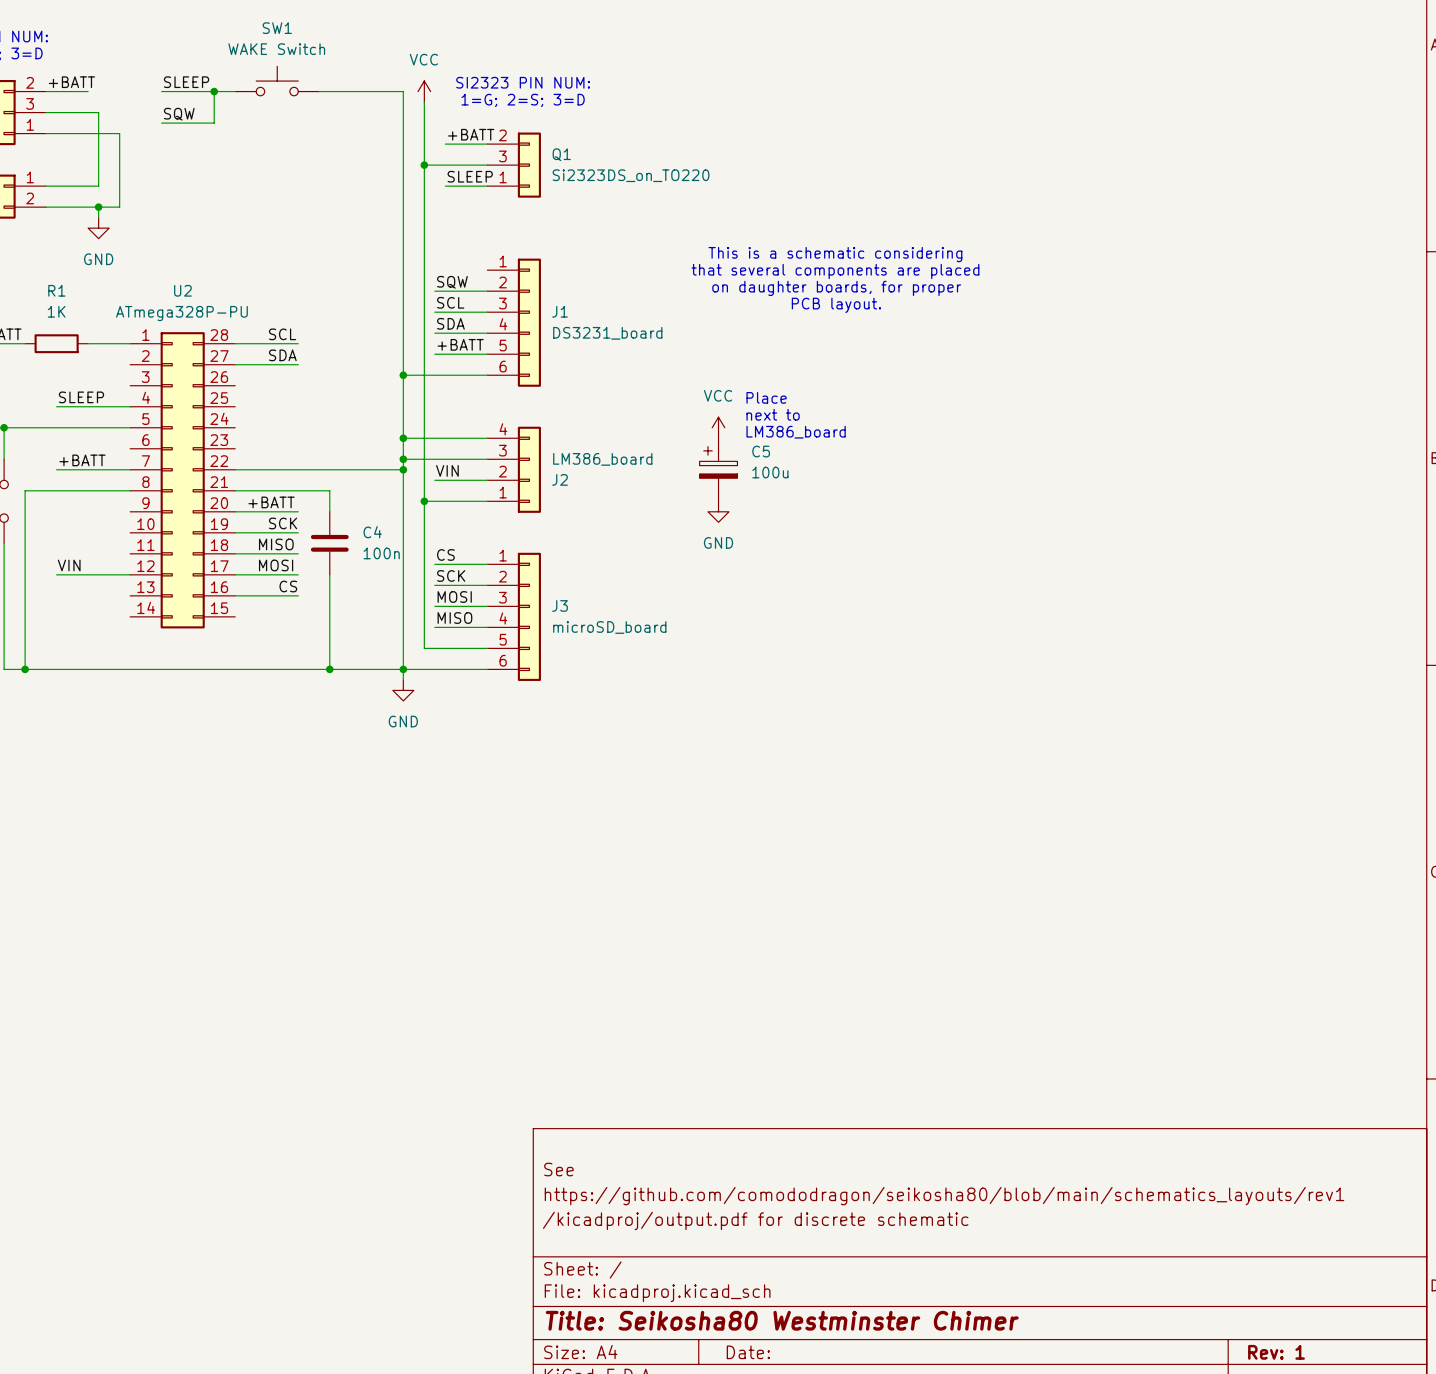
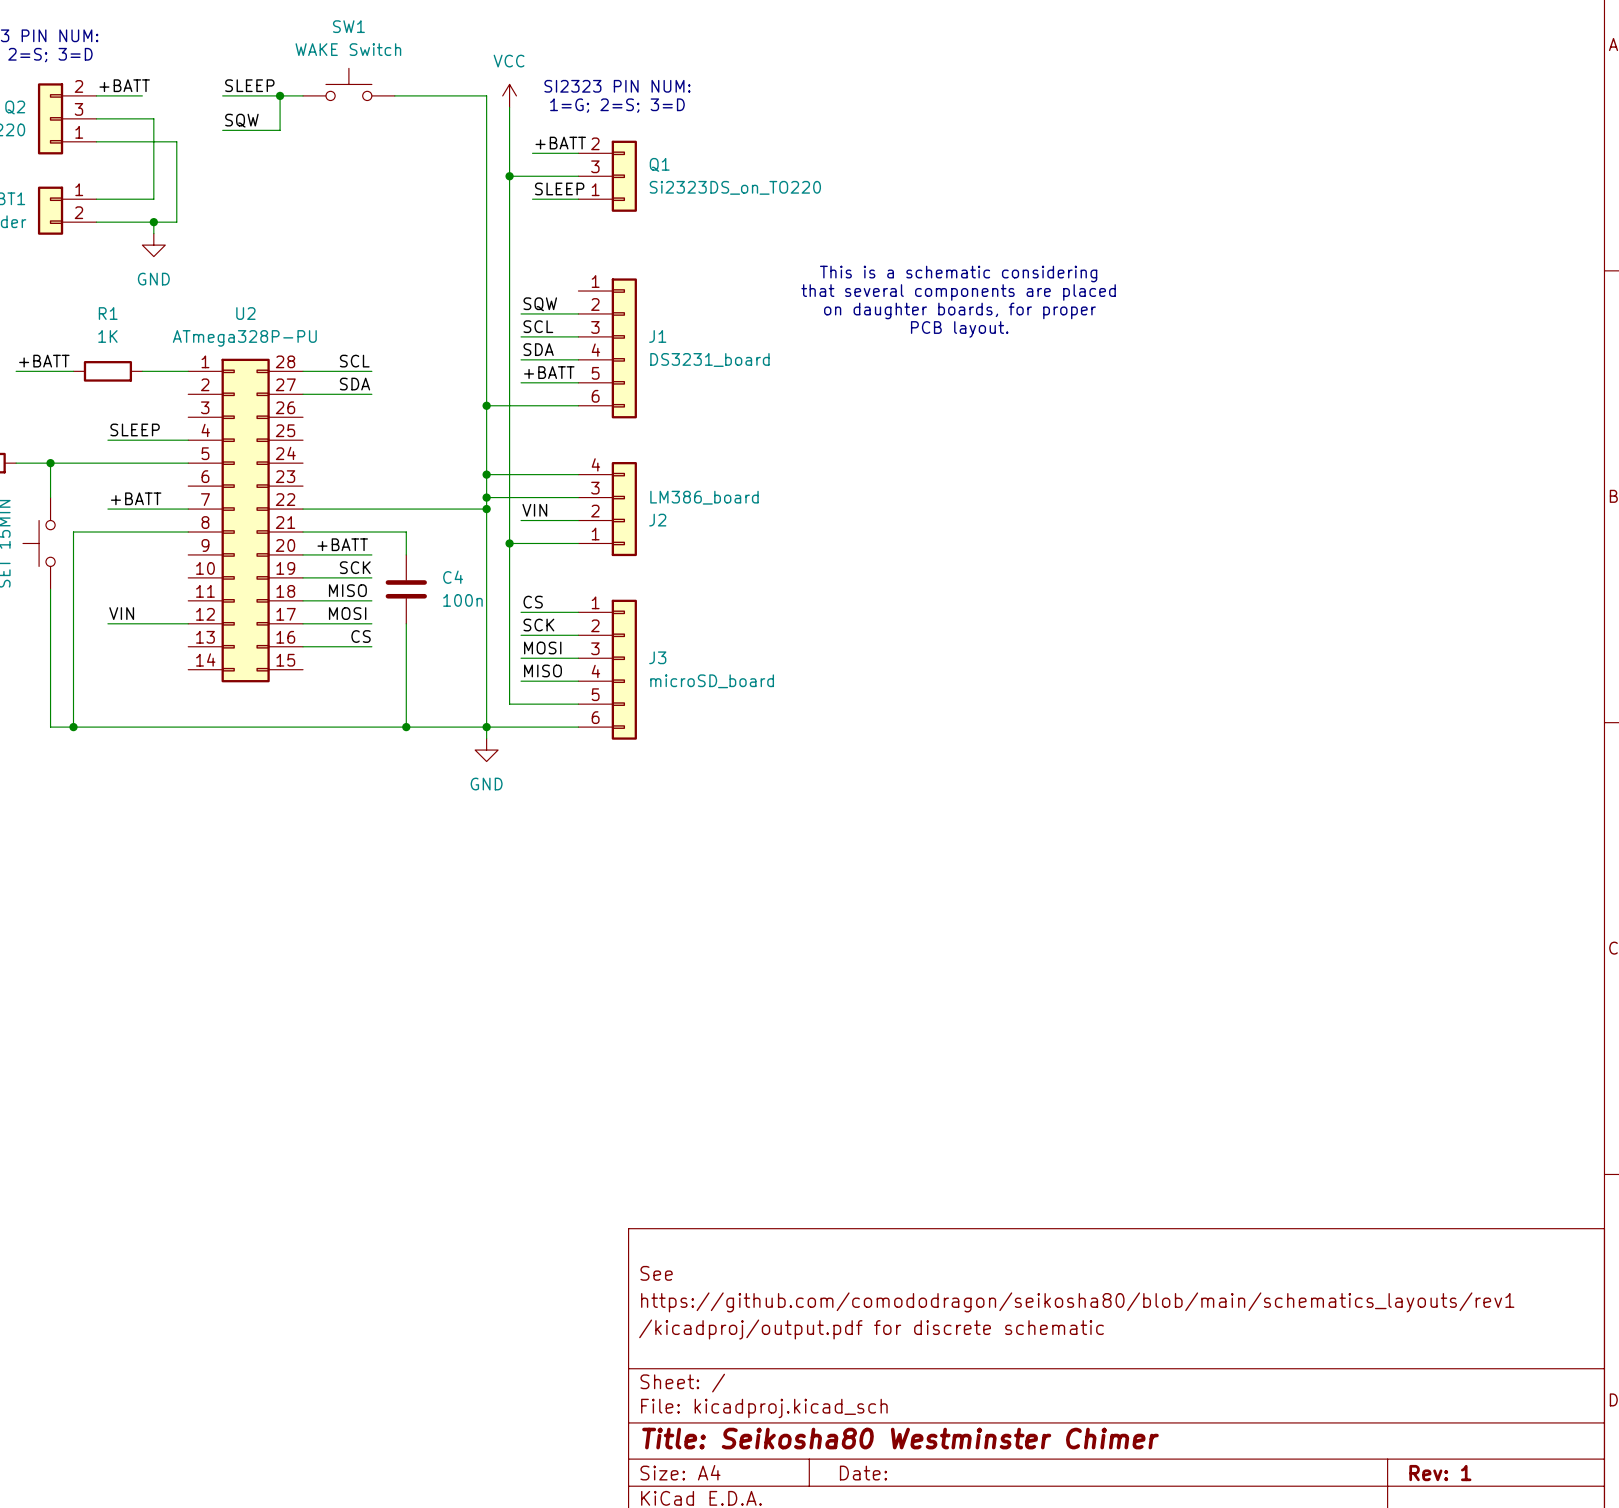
text: Place (766, 397) -> none
text: next to (773, 414) -> none
power symbol: VCC (718, 427) -> none
text: LM386_board (796, 432) -> none
C5: 100u (718, 469) -> none
power symbol: GND (718, 511) -> none

